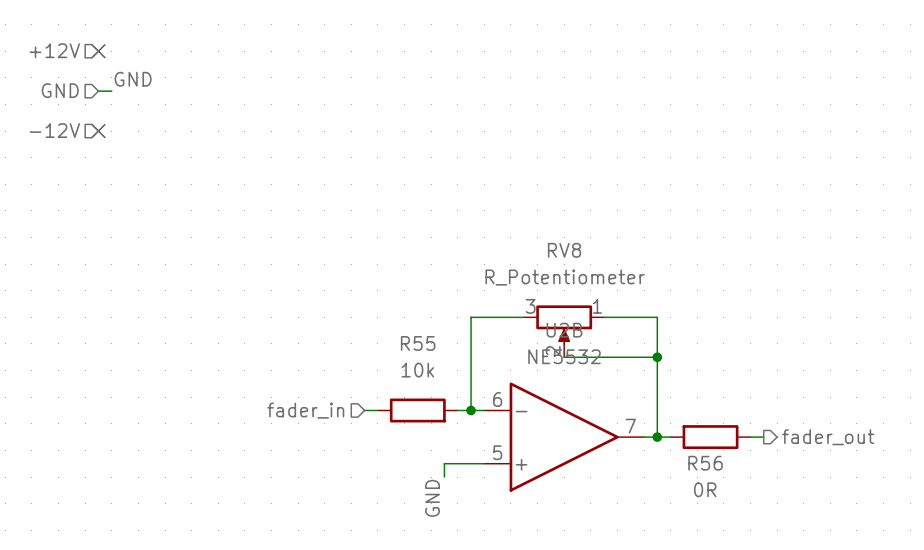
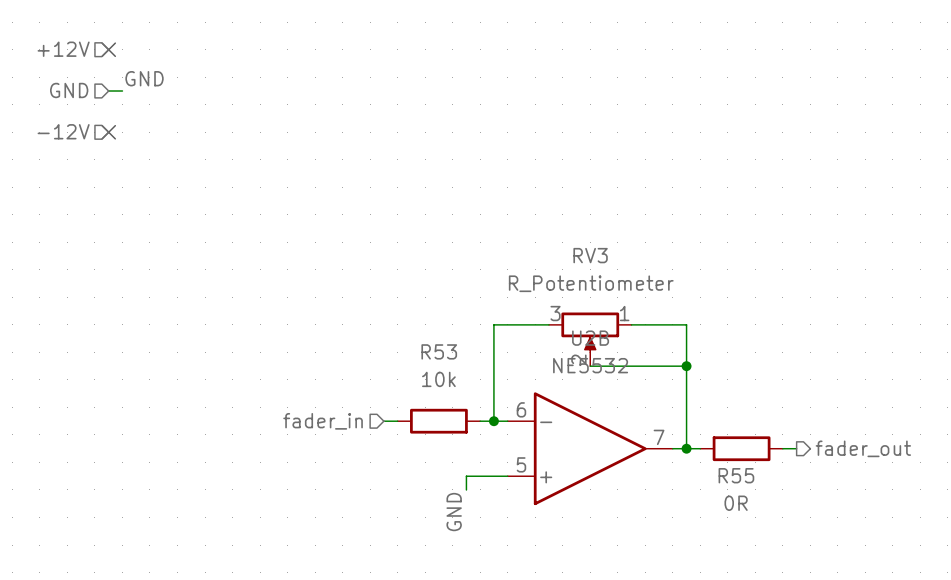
RV8 name: RV8 (564, 250) -> RV3 (590, 255)
R55 name: R55 (418, 343) -> R53 (439, 351)
R56 name: R56 (705, 463) -> R55 (736, 475)

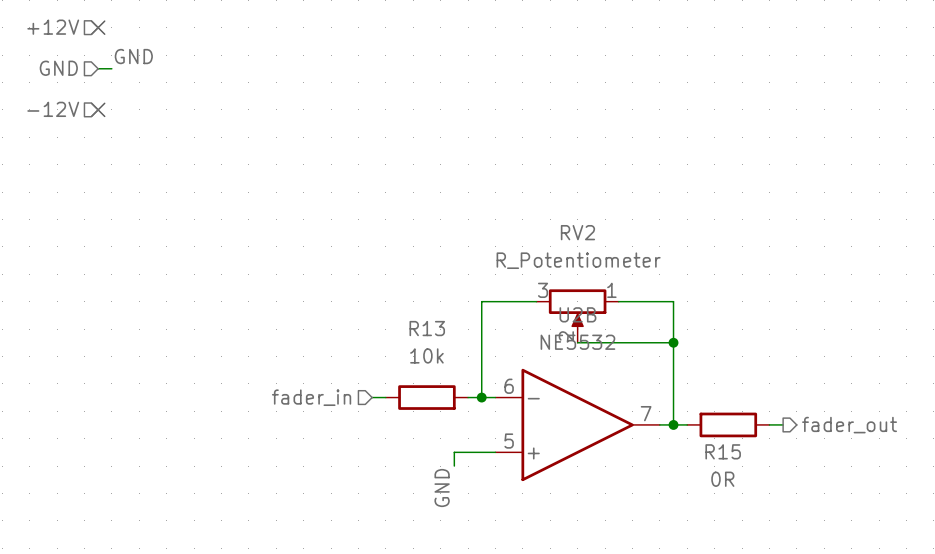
RV3 name: RV3 (590, 255) -> RV2 (577, 232)
R53 name: R53 (439, 351) -> R13 (427, 328)
R55 name: R55 (736, 475) -> R15 (723, 451)

